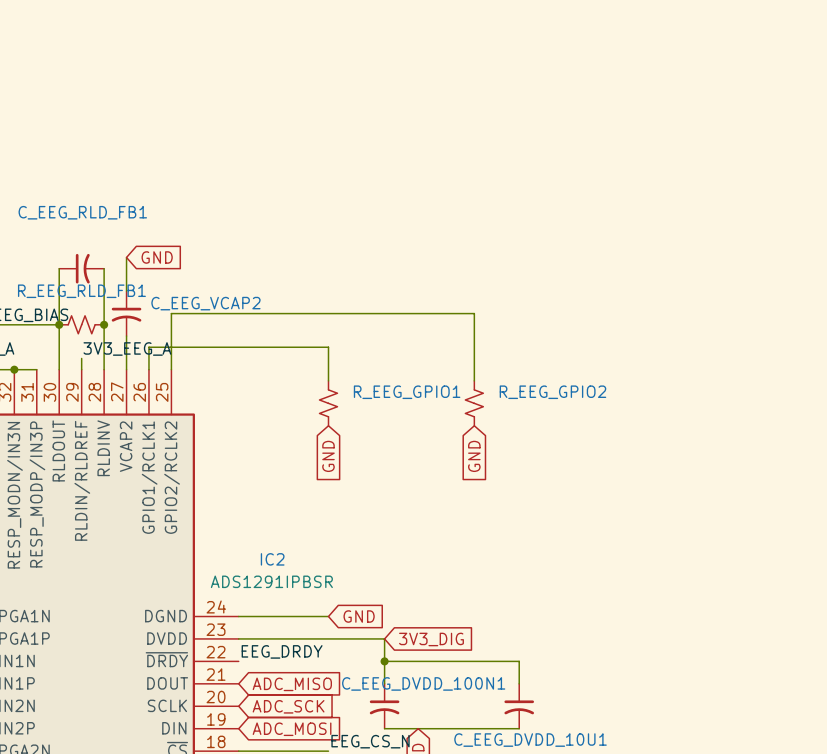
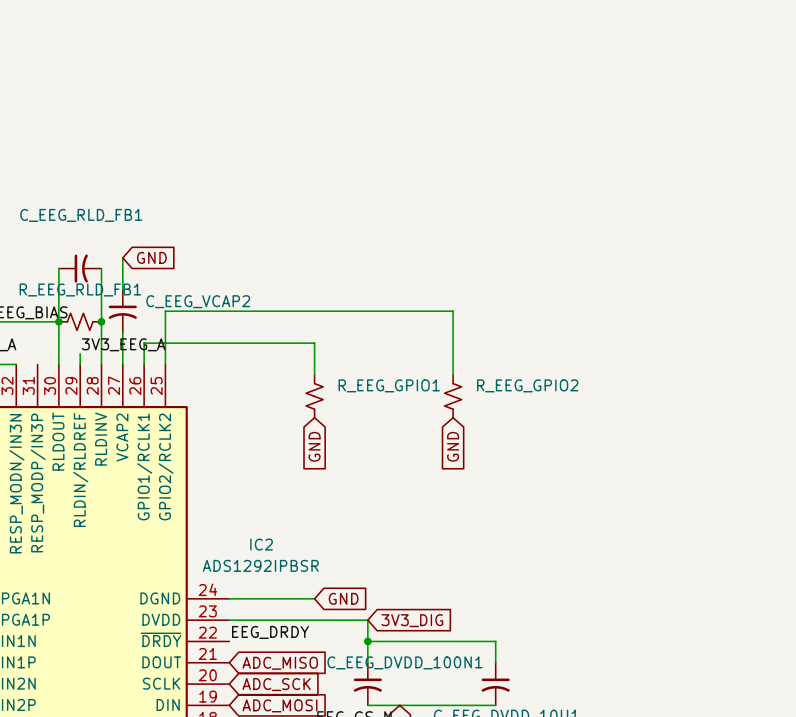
wire: (14, 369) (36, 369) -> none
junction: (14, 369) -> none
IC2 value: ADS1291IPBSR (271, 581) -> ADS1292IPBSR (260, 565)

